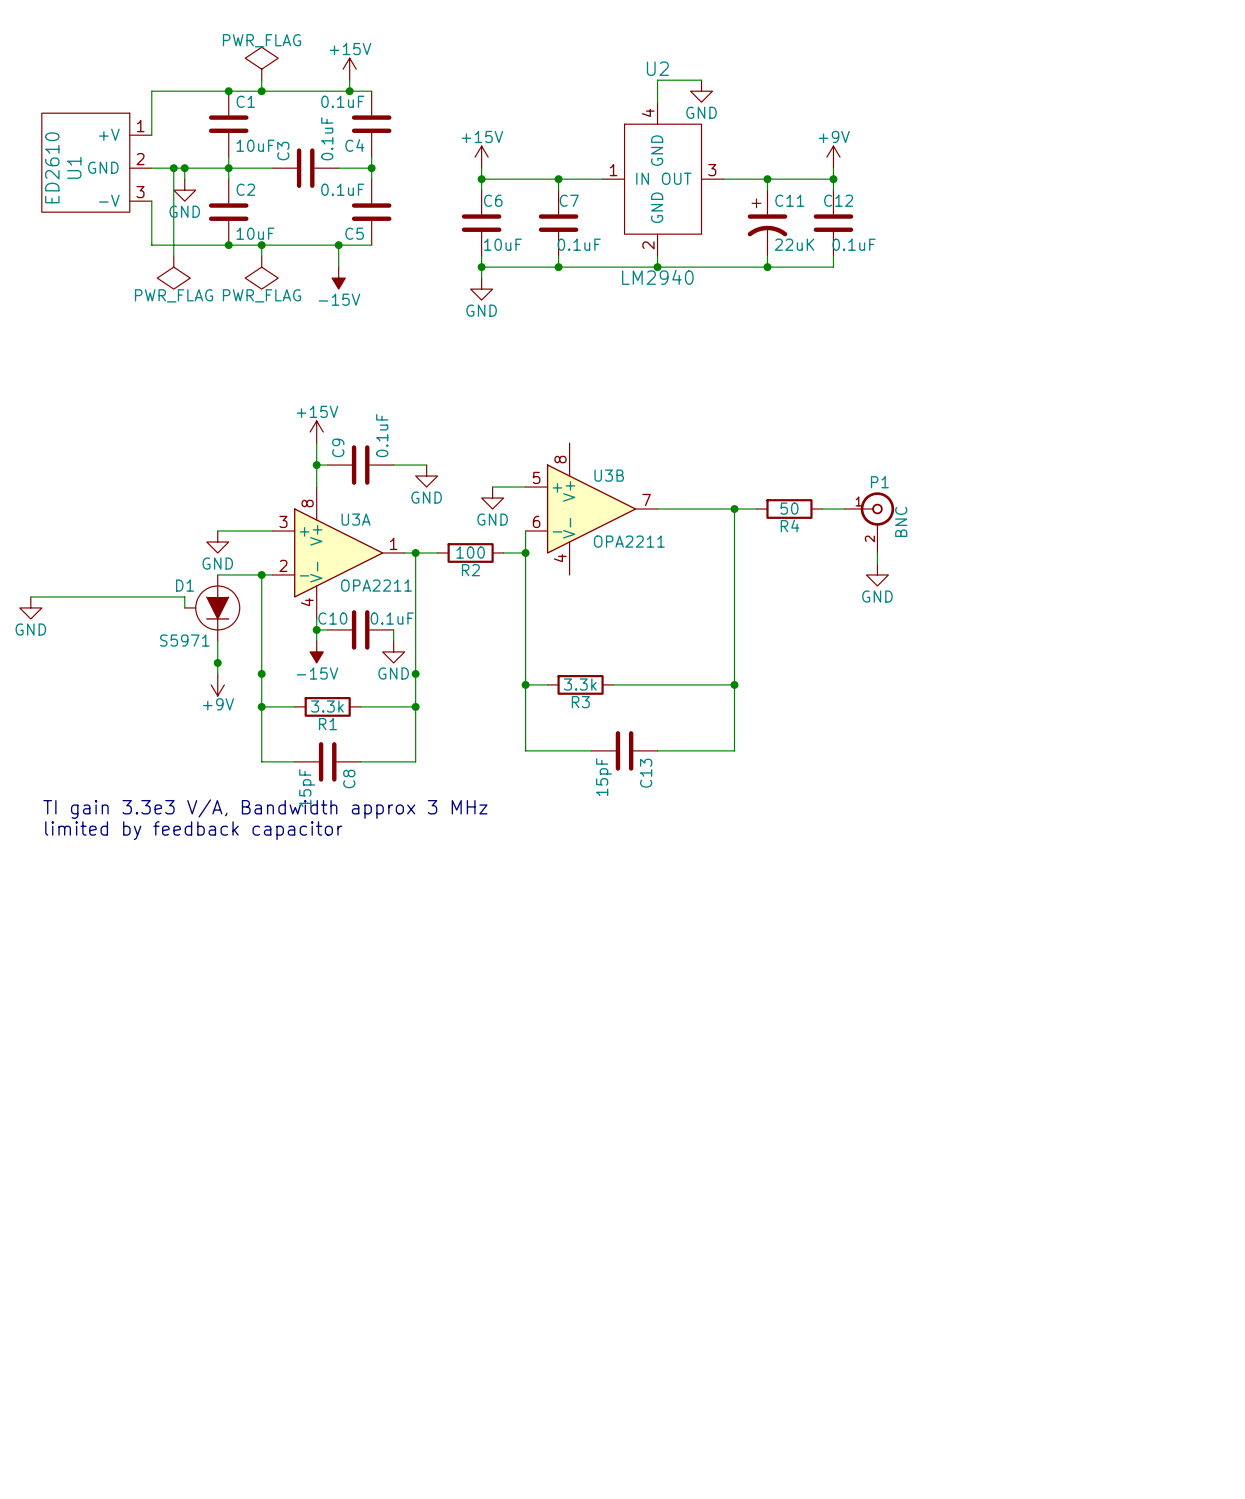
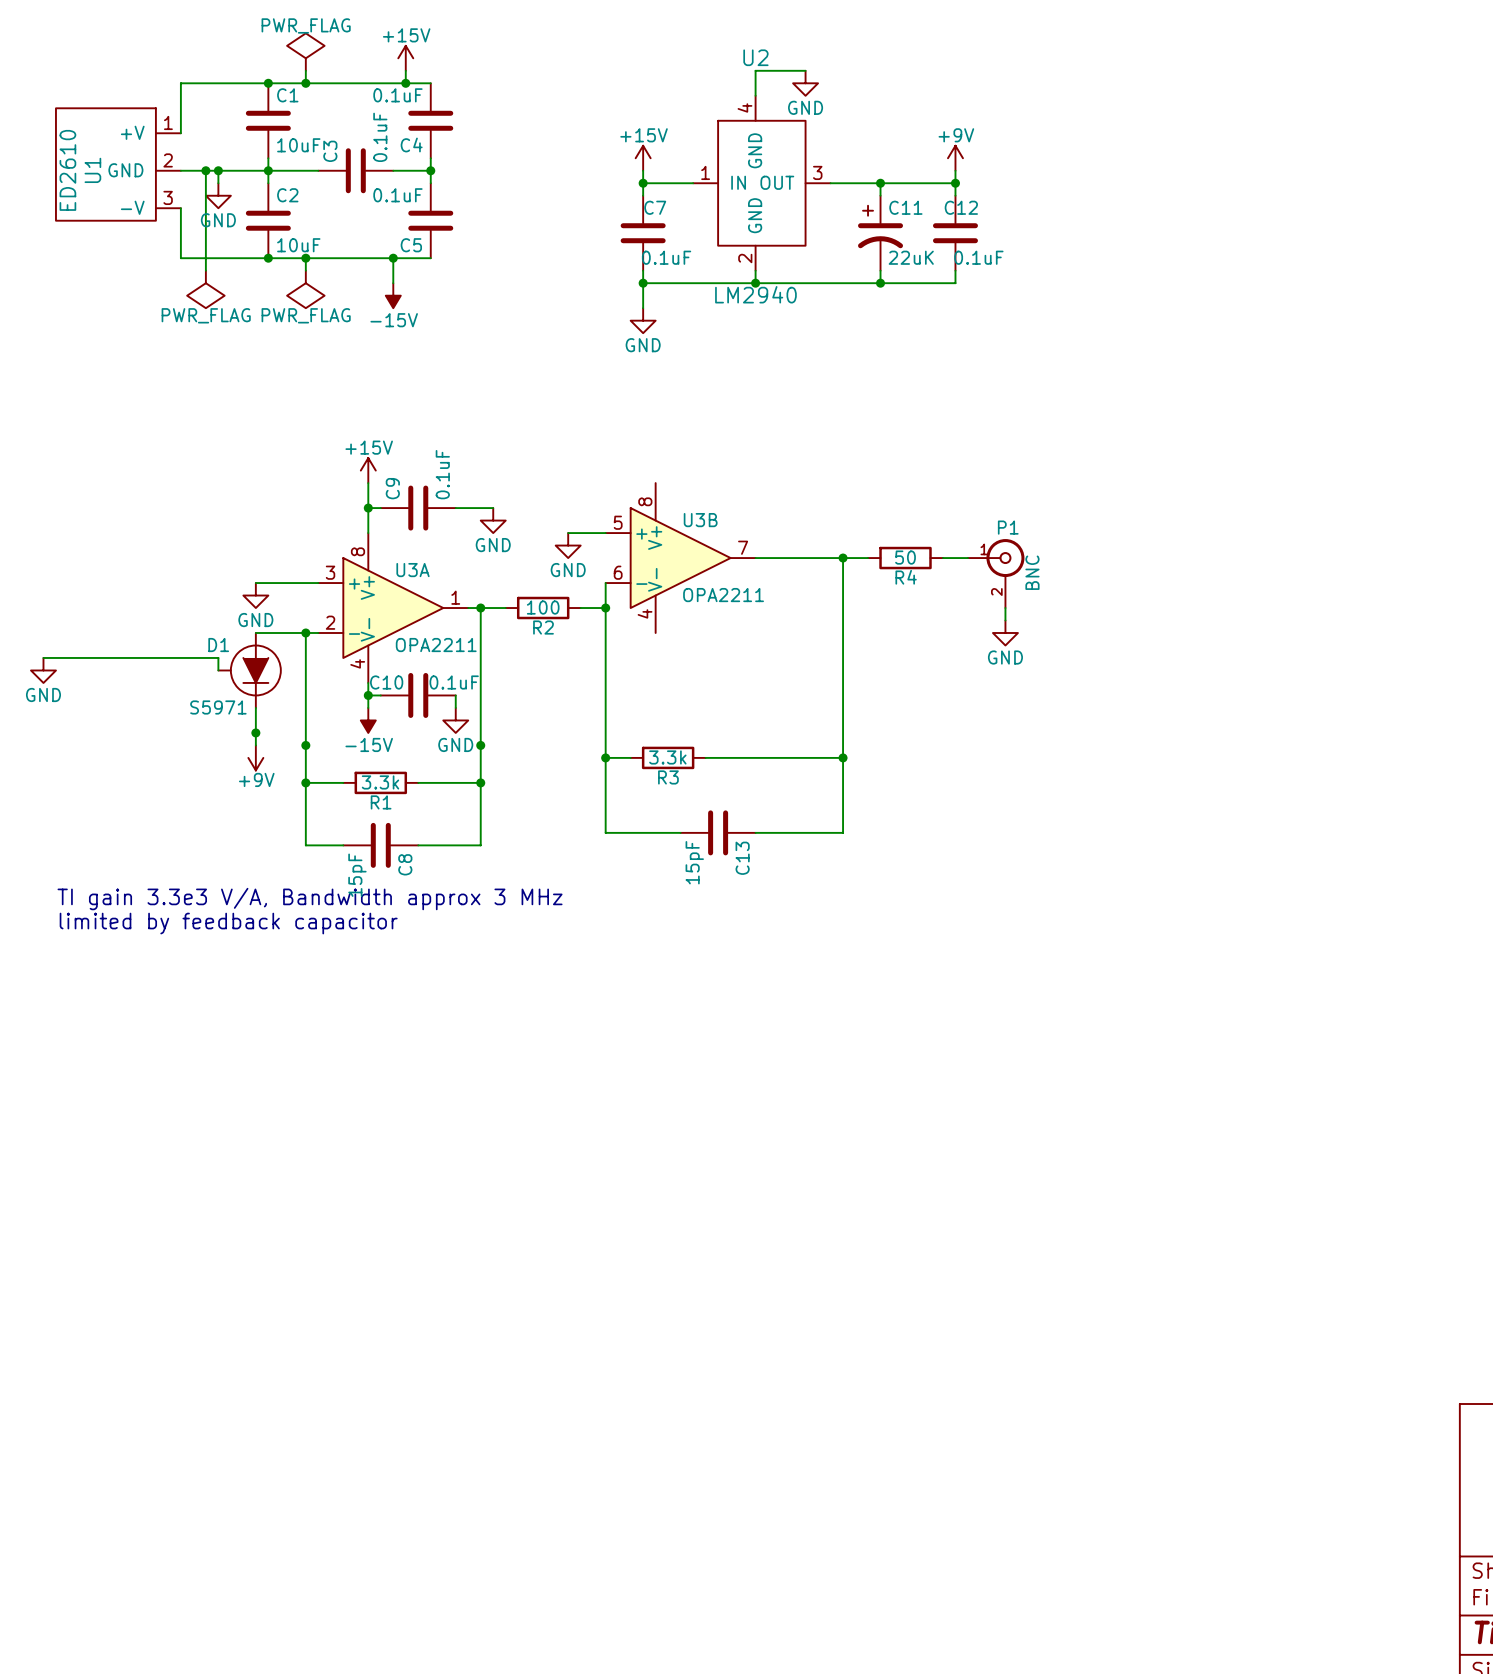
power symbol position: +15V (481, 157) -> +15V (643, 158)
wire: (481, 168) (481, 190) -> none
wire: (481, 179) (558, 179) -> (643, 170) (643, 183)
junction: (481, 179) -> none
C6: 10uF (481, 223) -> none
wire: (481, 256) (481, 278) -> none
wire: (481, 267) (558, 267) -> (643, 308) (643, 283)
junction: (481, 267) -> none
power symbol position: GND (481, 289) -> GND (643, 320)

